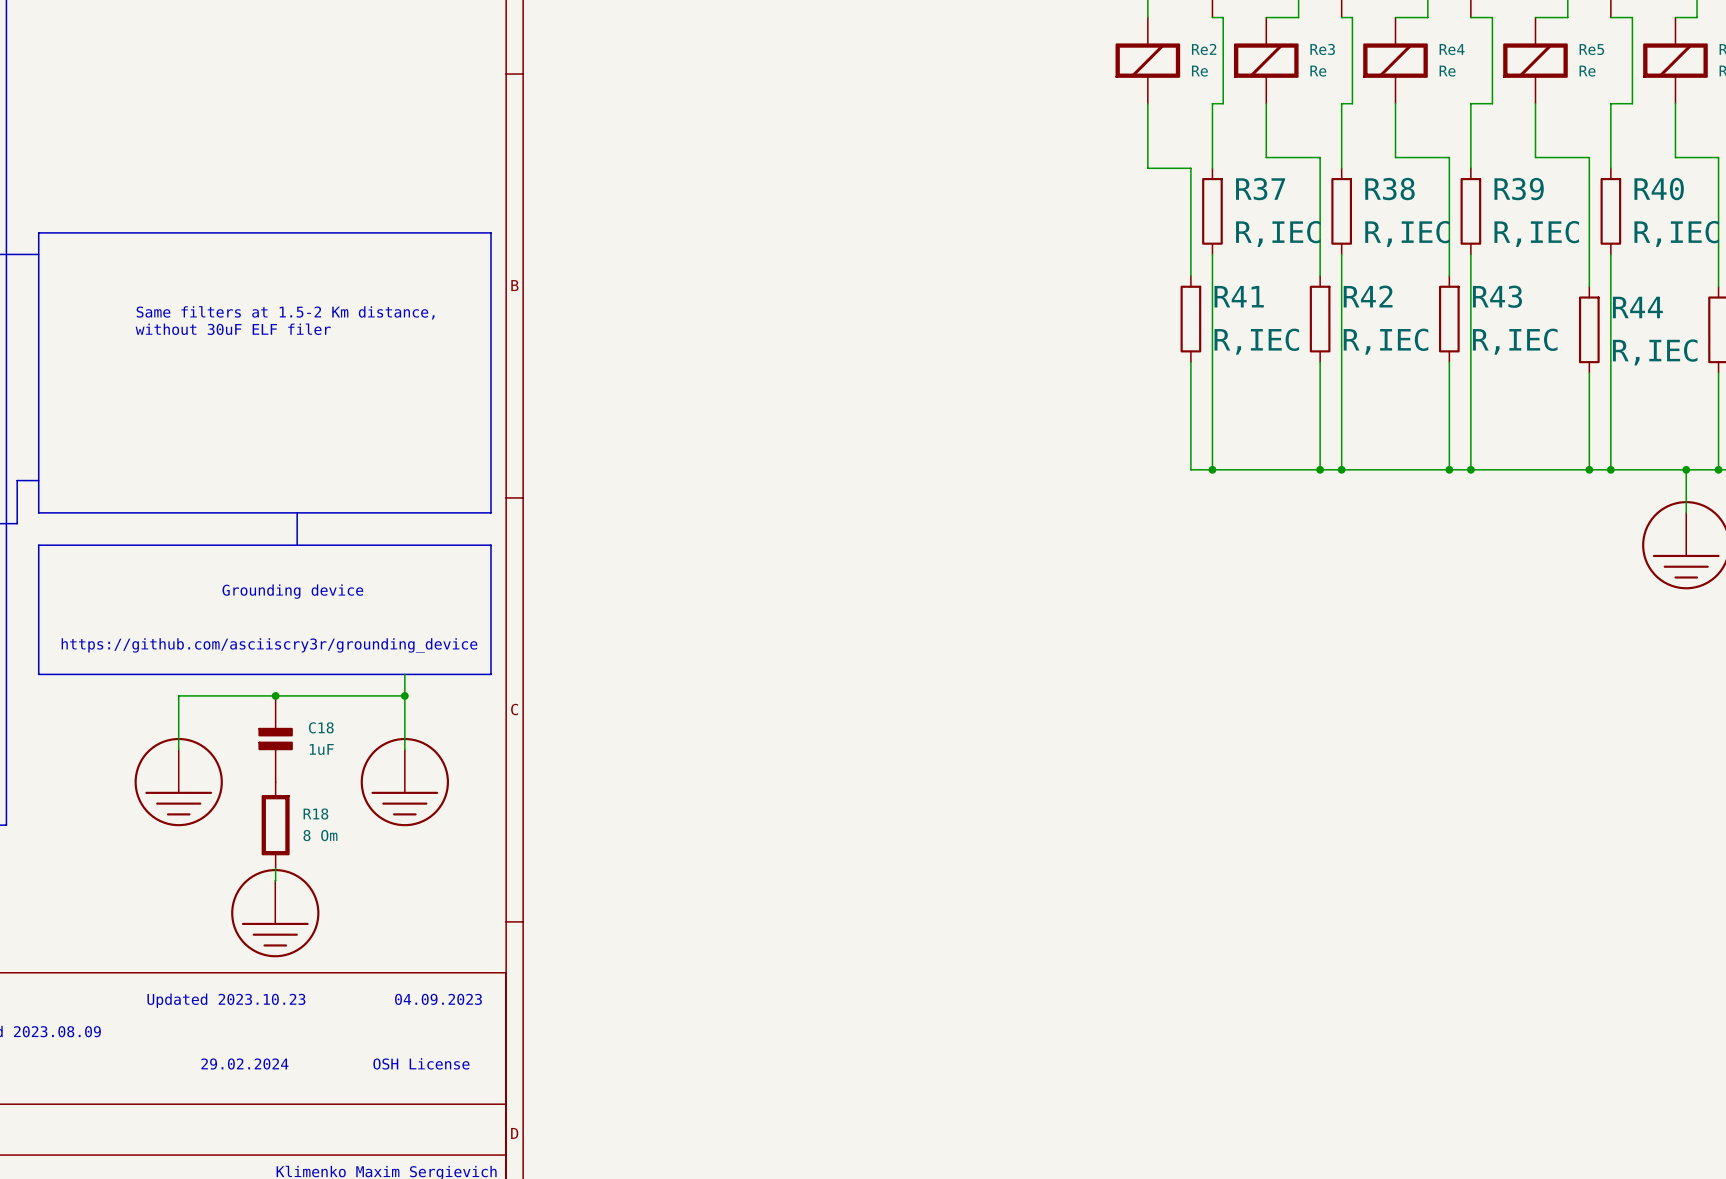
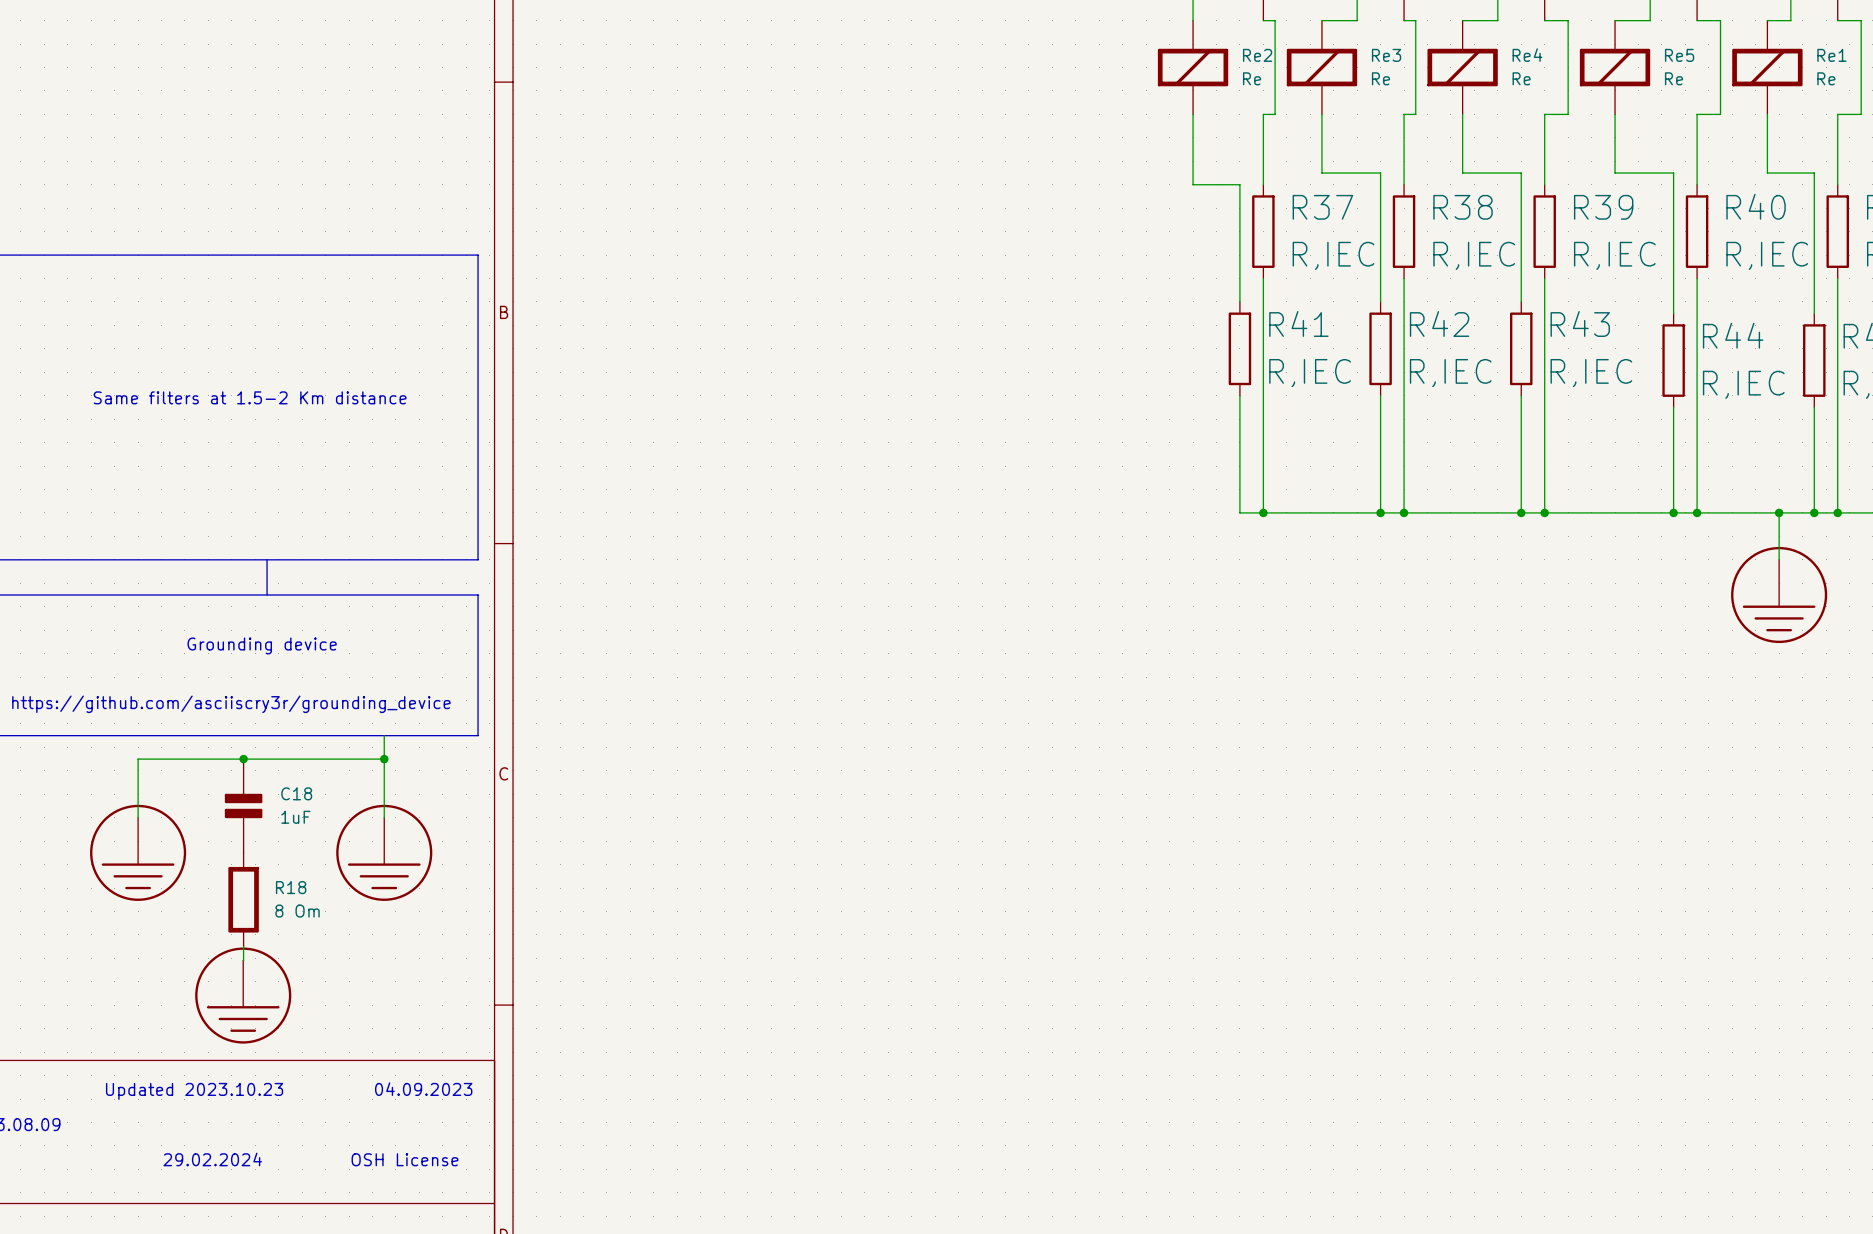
text: Same filters at 1.5-2 Km distance, (285, 312) -> none
text: without 30uF ELF filer (233, 329) -> none
text: none -> Same filters at 1.5-2 Km distance (250, 397)

